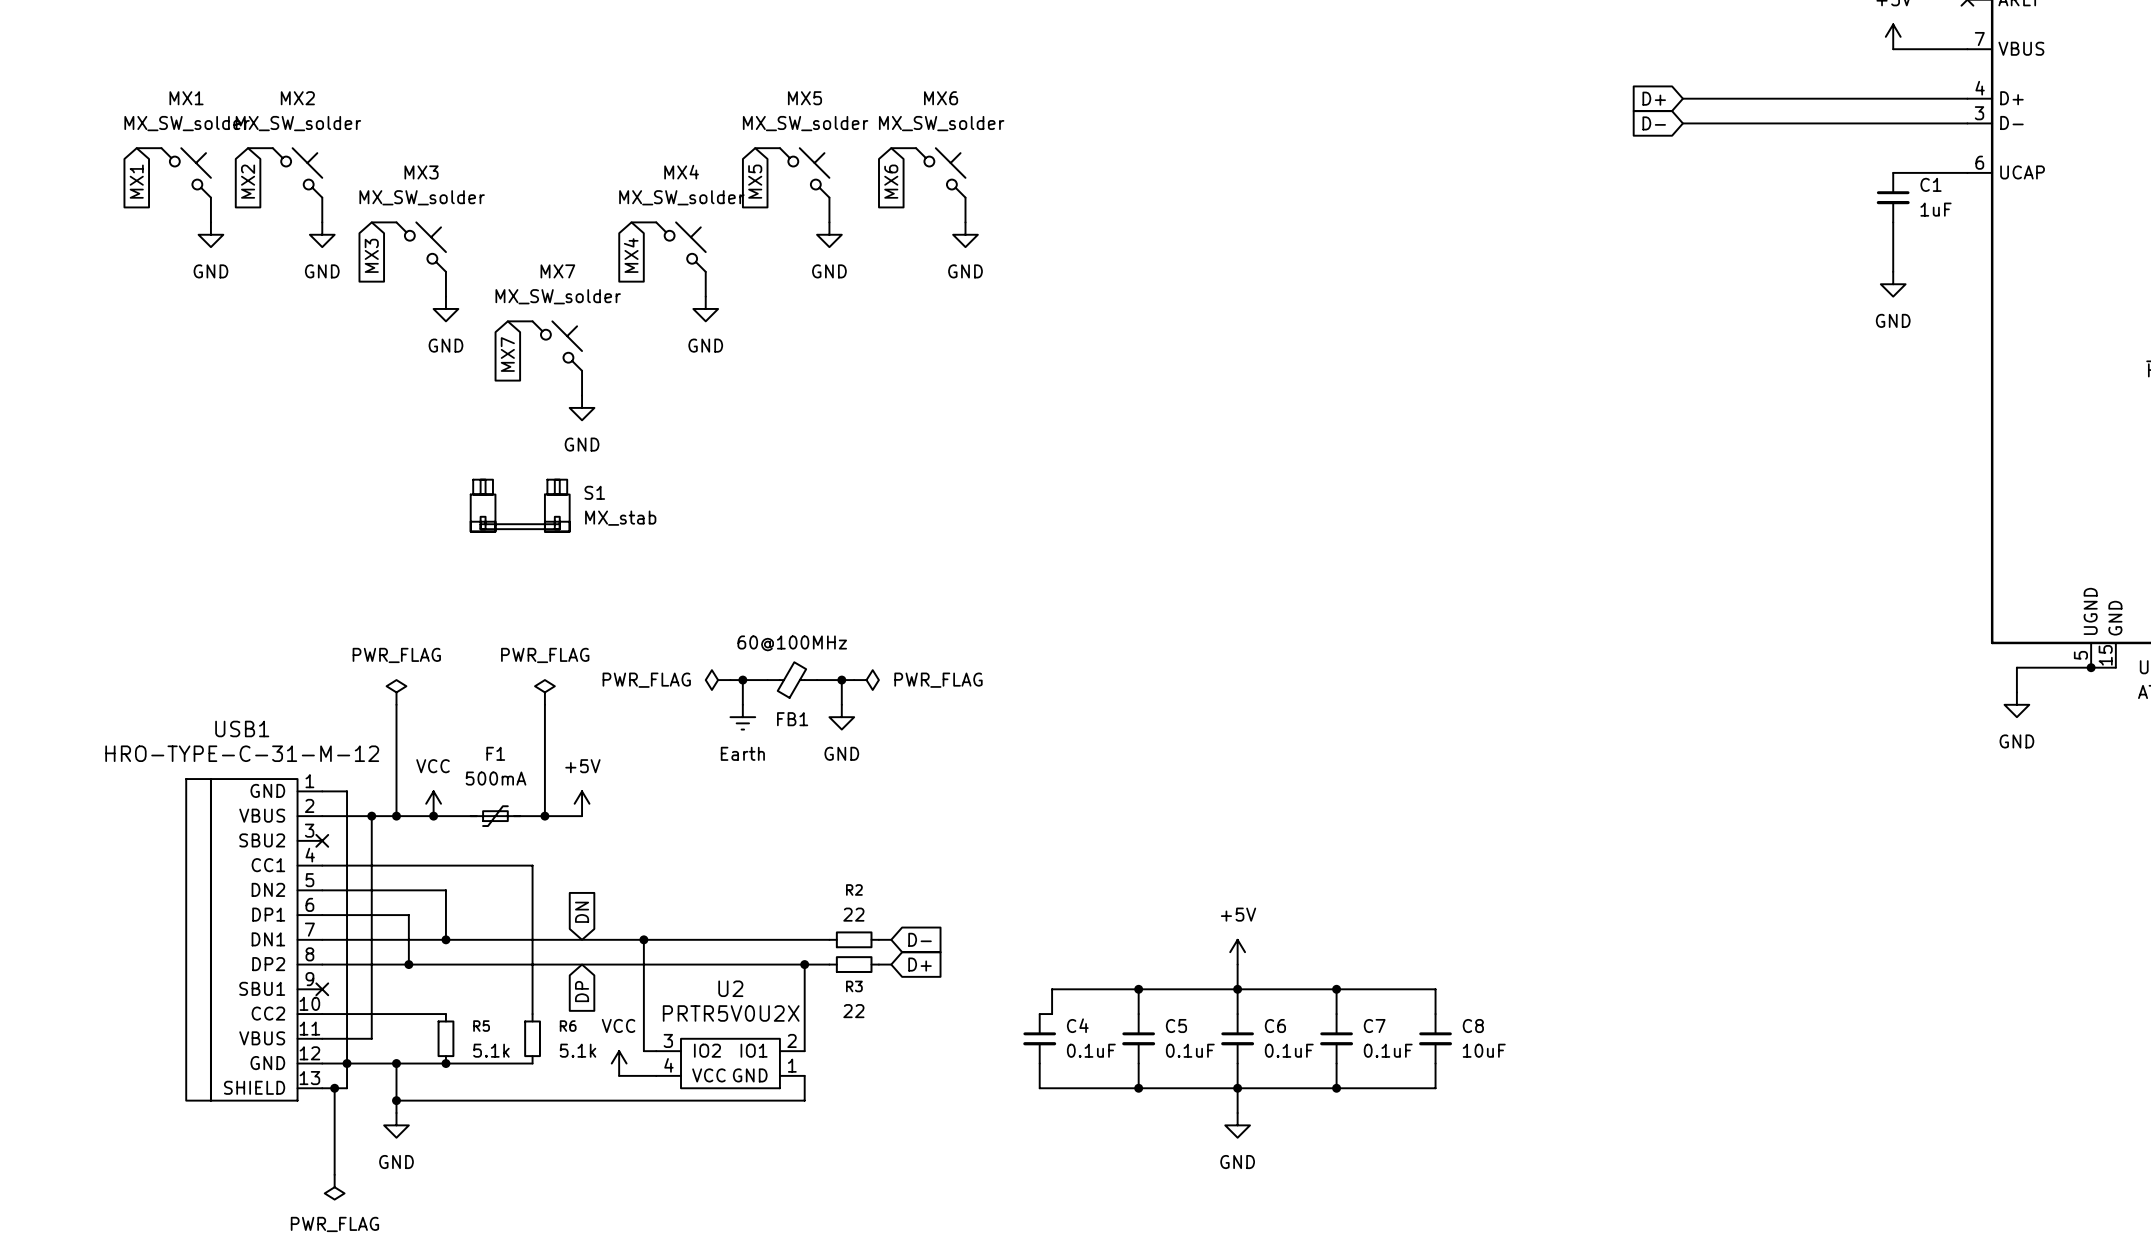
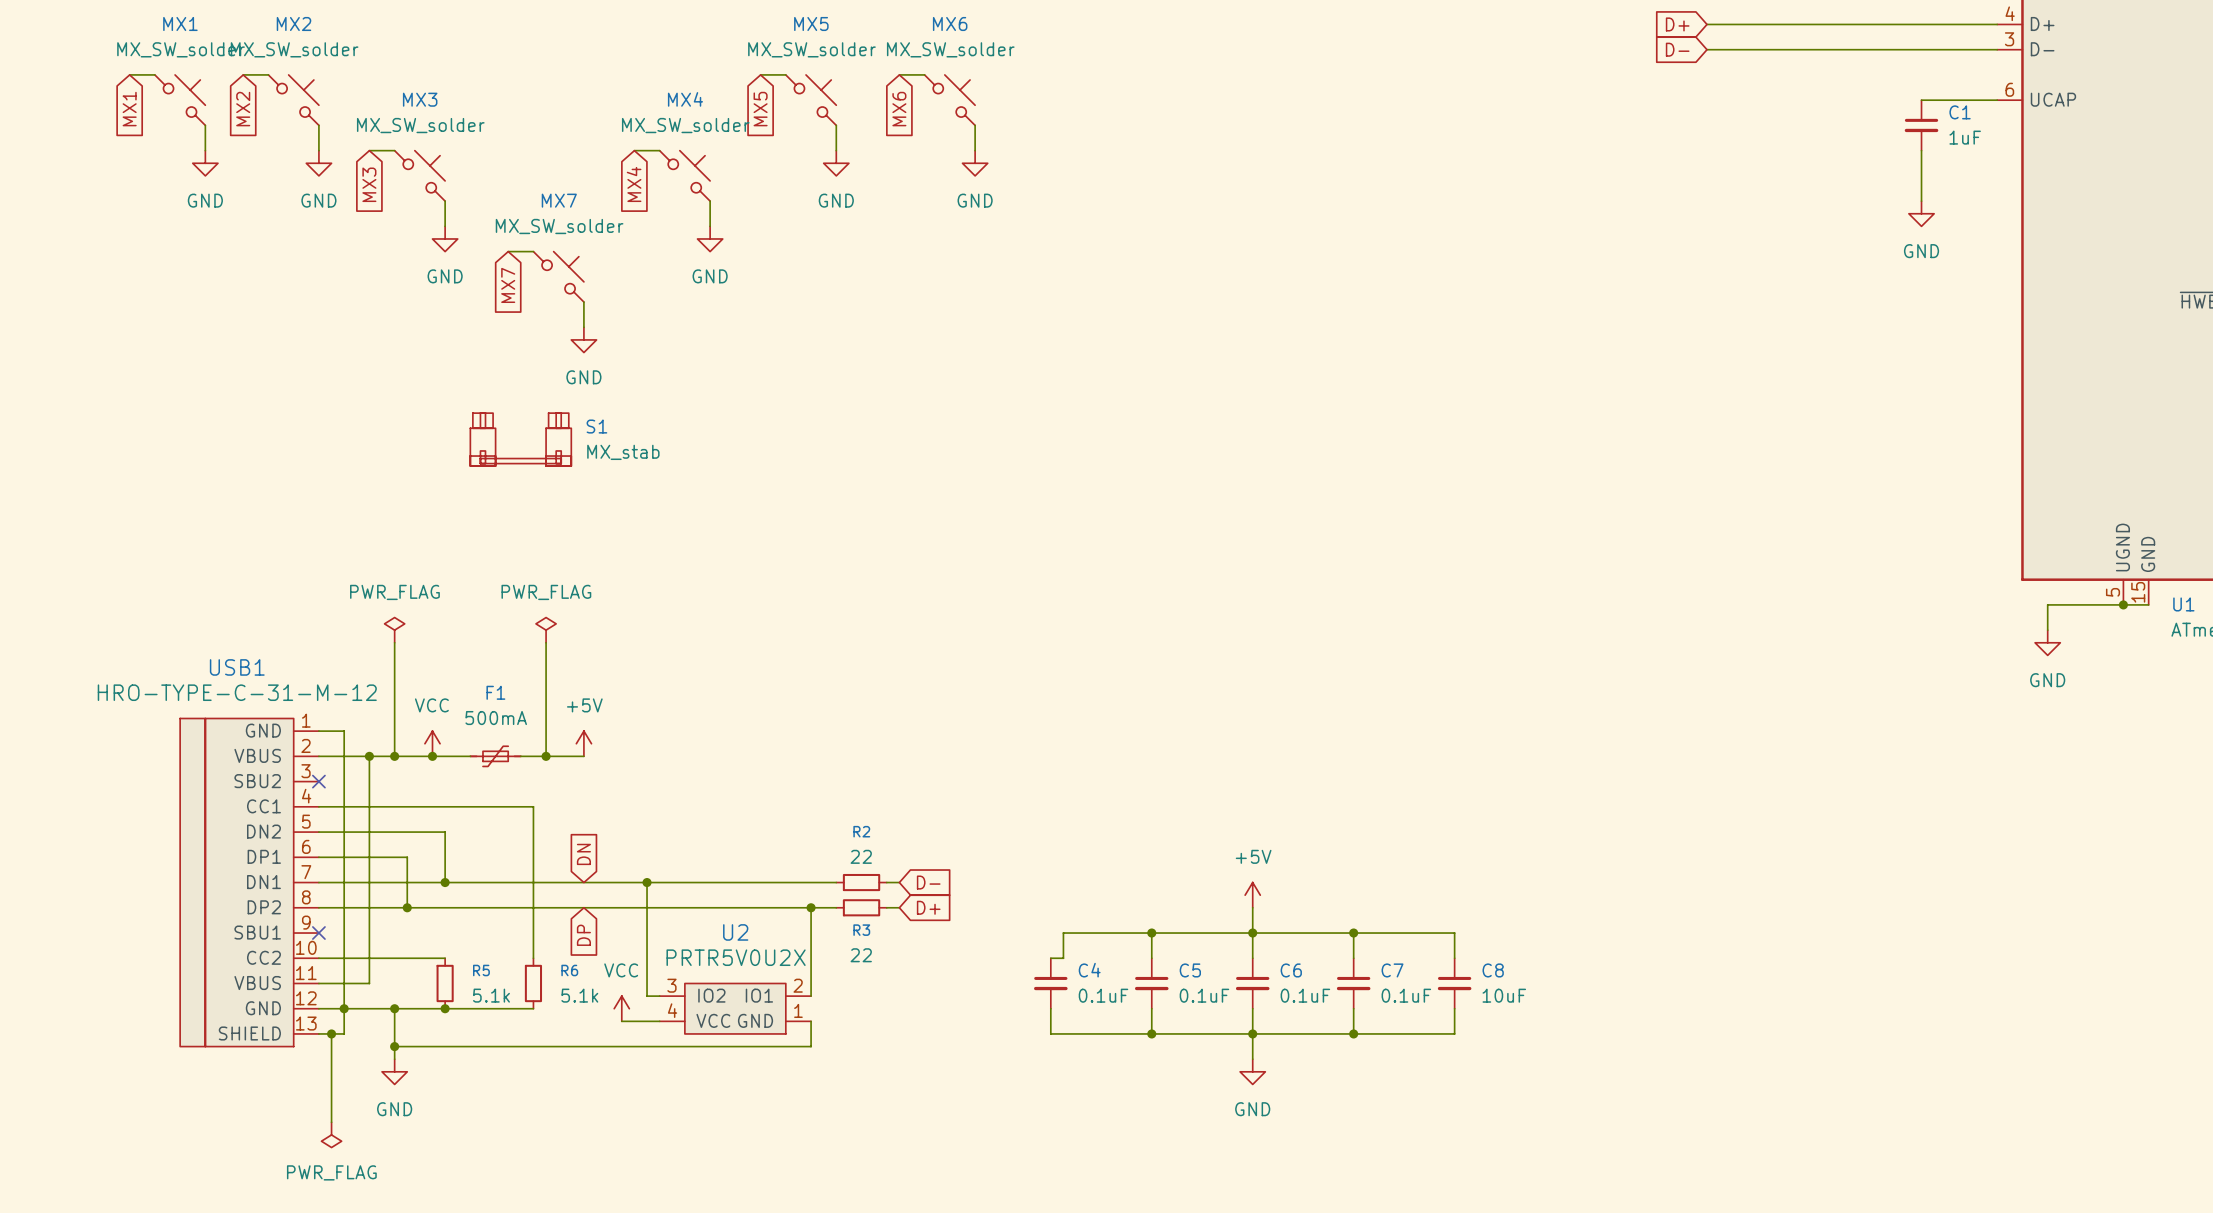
power symbol: PWR_FLAG (718, 680) -> none
wire: (730, 680) (767, 680) -> none
wire: (742, 680) (742, 704) -> none
junction: (742, 680) -> none
FB1: 60@100MHz (792, 680) -> none
wire: (817, 680) (854, 680) -> none
wire: (841, 680) (841, 704) -> none
junction: (841, 680) -> none
power symbol: PWR_FLAG (866, 680) -> none
power symbol: Earth (742, 717) -> none
power symbol: GND (841, 717) -> none

